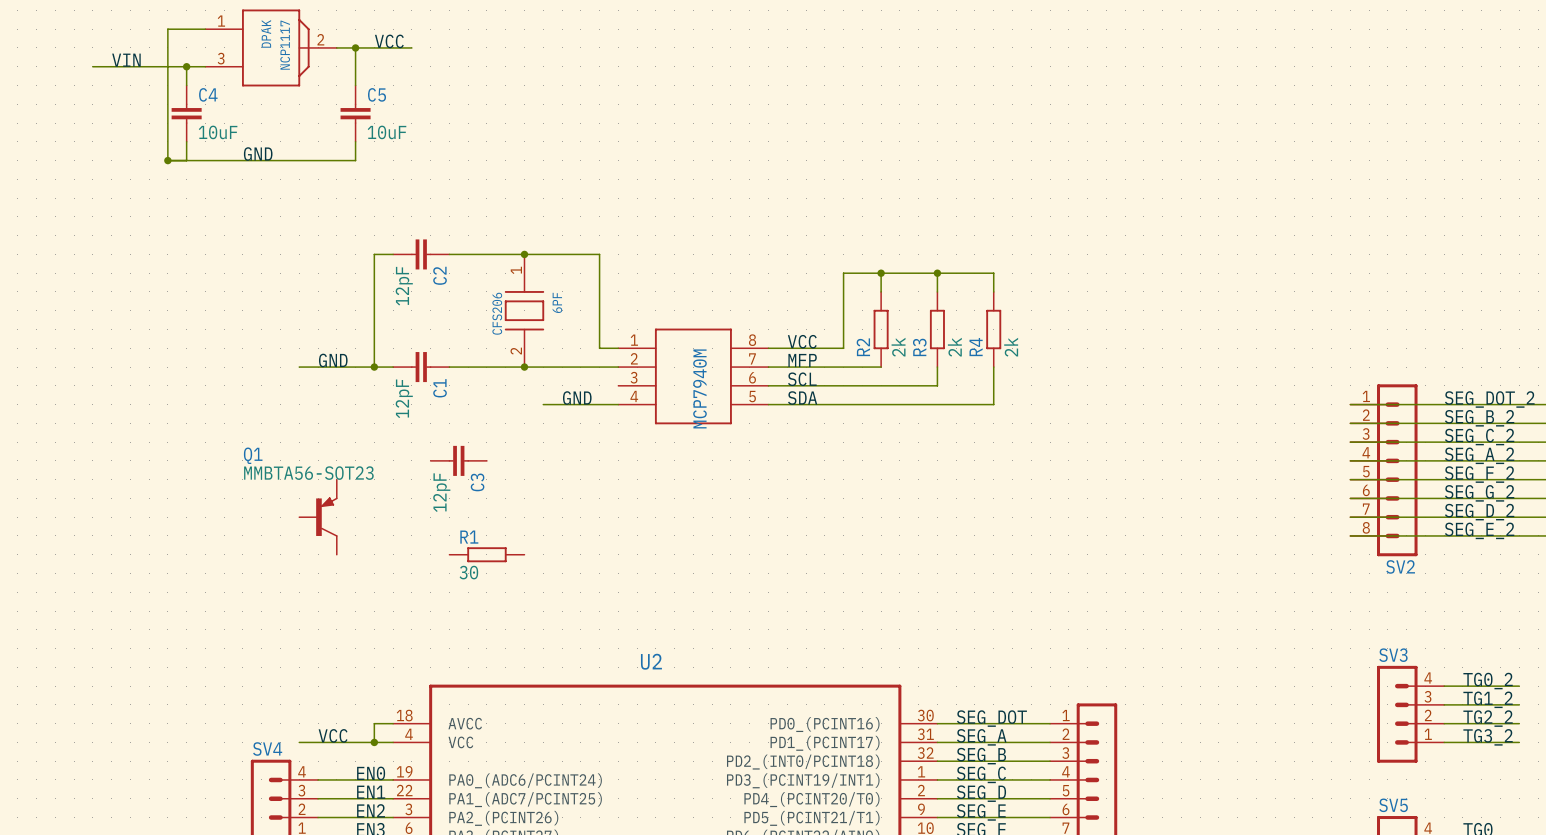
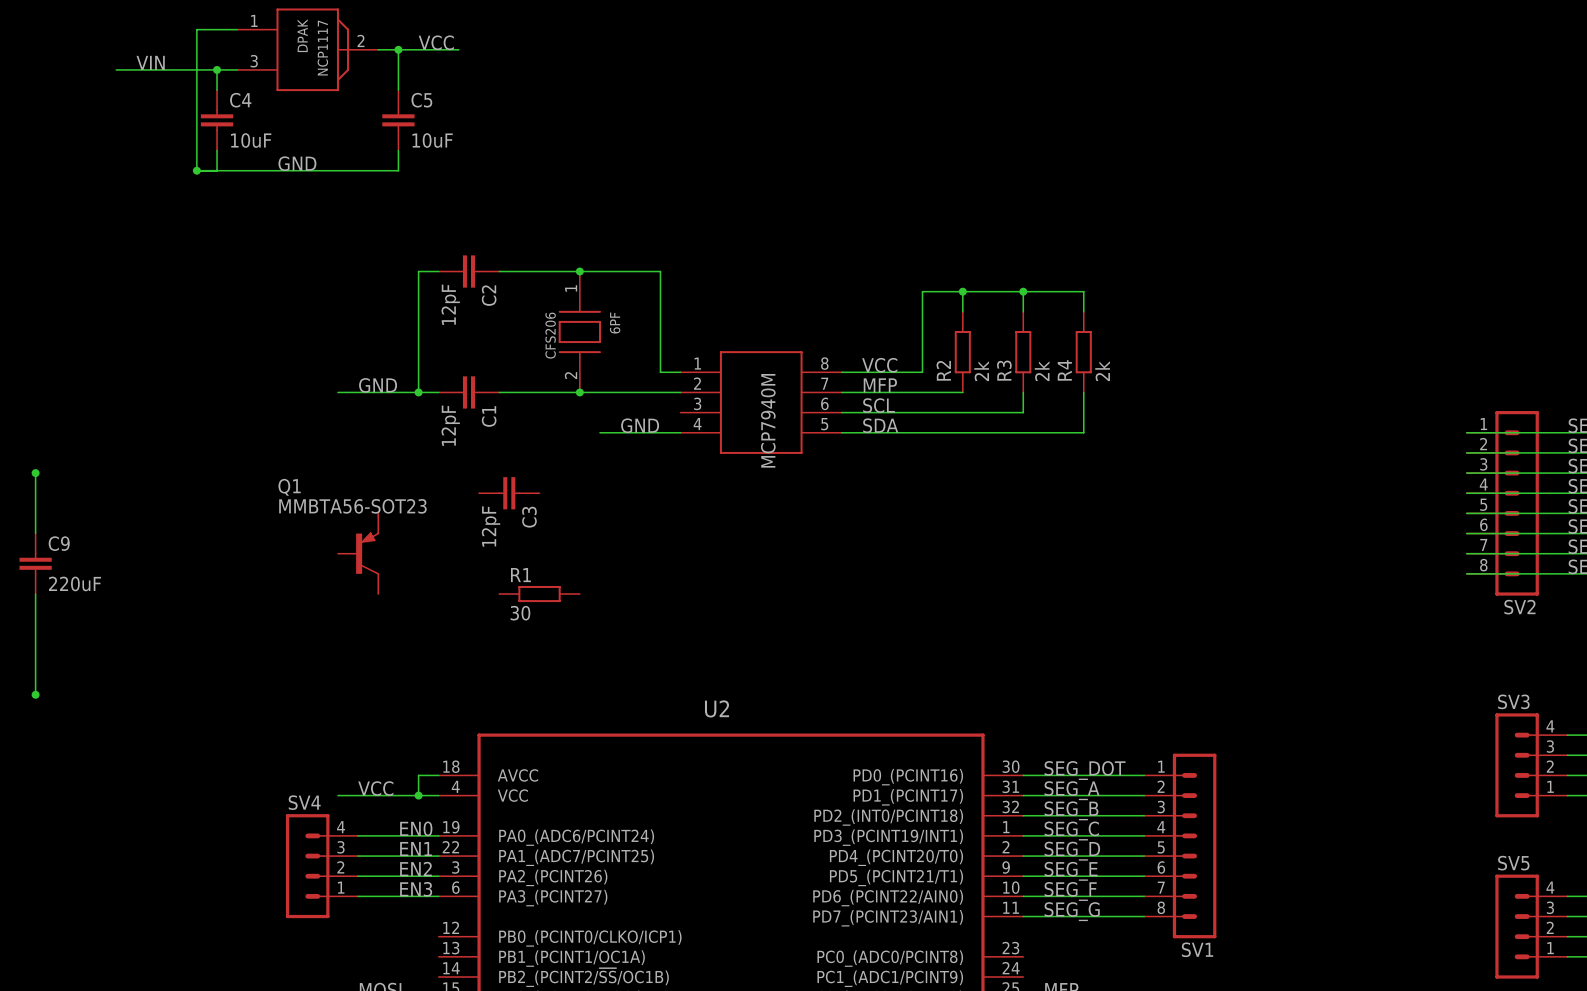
wire: none -> (35, 473) (35, 533)
junction: none -> (35, 473)
C9: none -> 220uF (35, 563)
wire: none -> (35, 594) (35, 694)
junction: none -> (35, 694)

